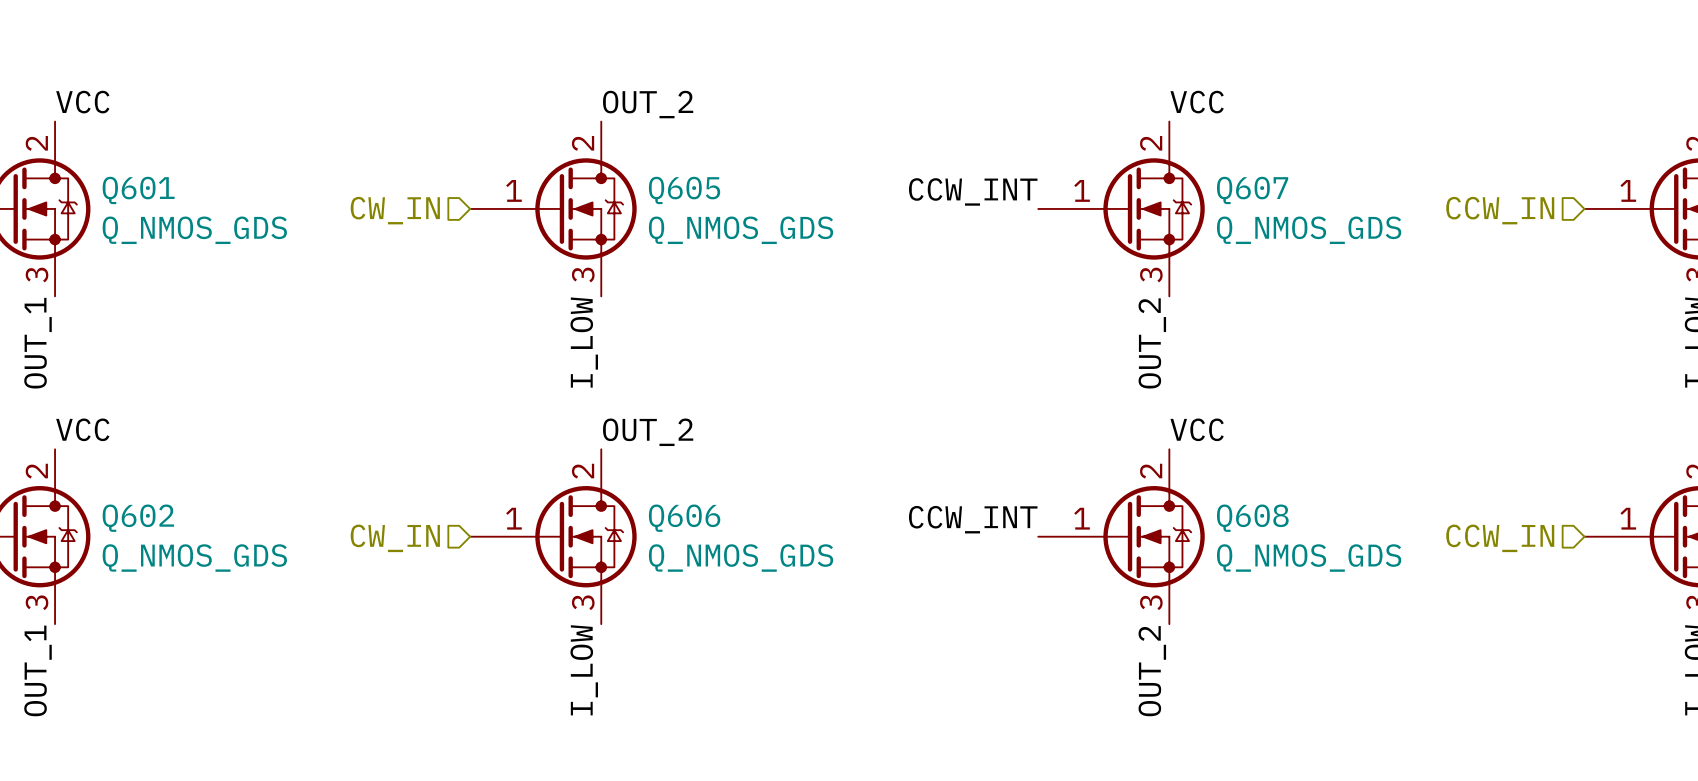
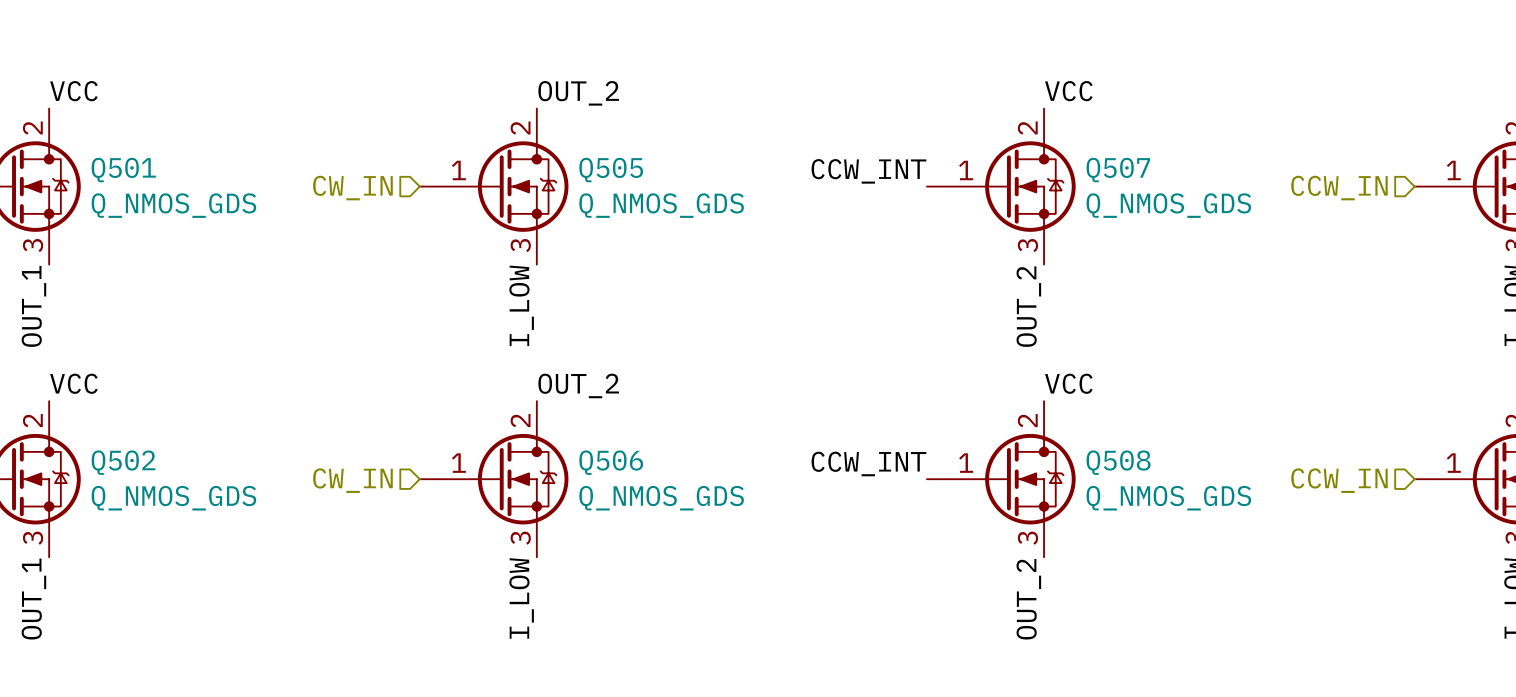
Q601 name: Q601 (138, 190) -> Q501 (123, 170)
Q605 name: Q605 (684, 190) -> Q505 (611, 170)
Q607 name: Q607 (1252, 190) -> Q507 (1118, 170)
Q602 name: Q602 (138, 518) -> Q502 (123, 462)
Q606 name: Q606 (684, 518) -> Q506 (611, 462)
Q608 name: Q608 (1252, 518) -> Q508 (1118, 462)

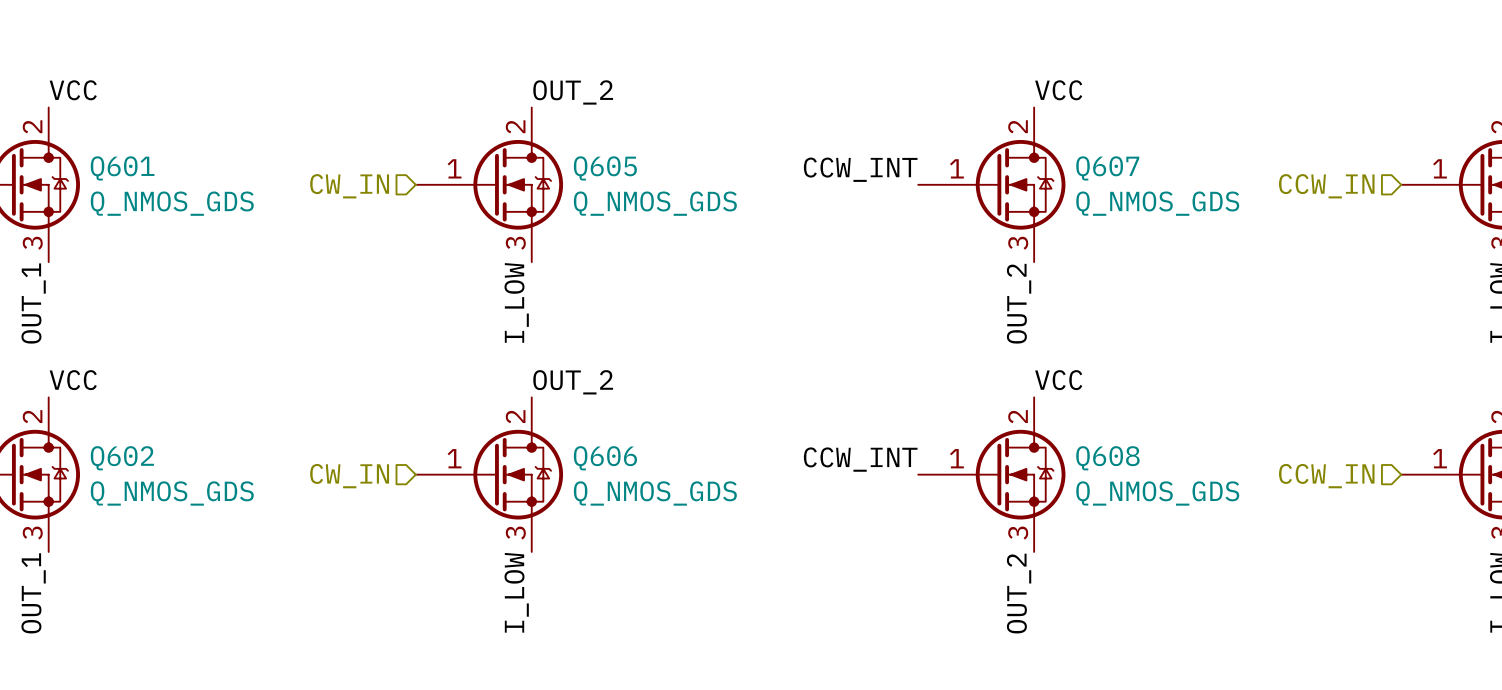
Q501 name: Q501 (123, 170) -> Q601 (122, 168)
Q505 name: Q505 (611, 170) -> Q605 (605, 168)
Q507 name: Q507 (1118, 170) -> Q607 (1107, 168)
Q502 name: Q502 (123, 462) -> Q602 (122, 458)
Q506 name: Q506 (611, 462) -> Q606 (605, 458)
Q508 name: Q508 (1118, 462) -> Q608 (1107, 458)

